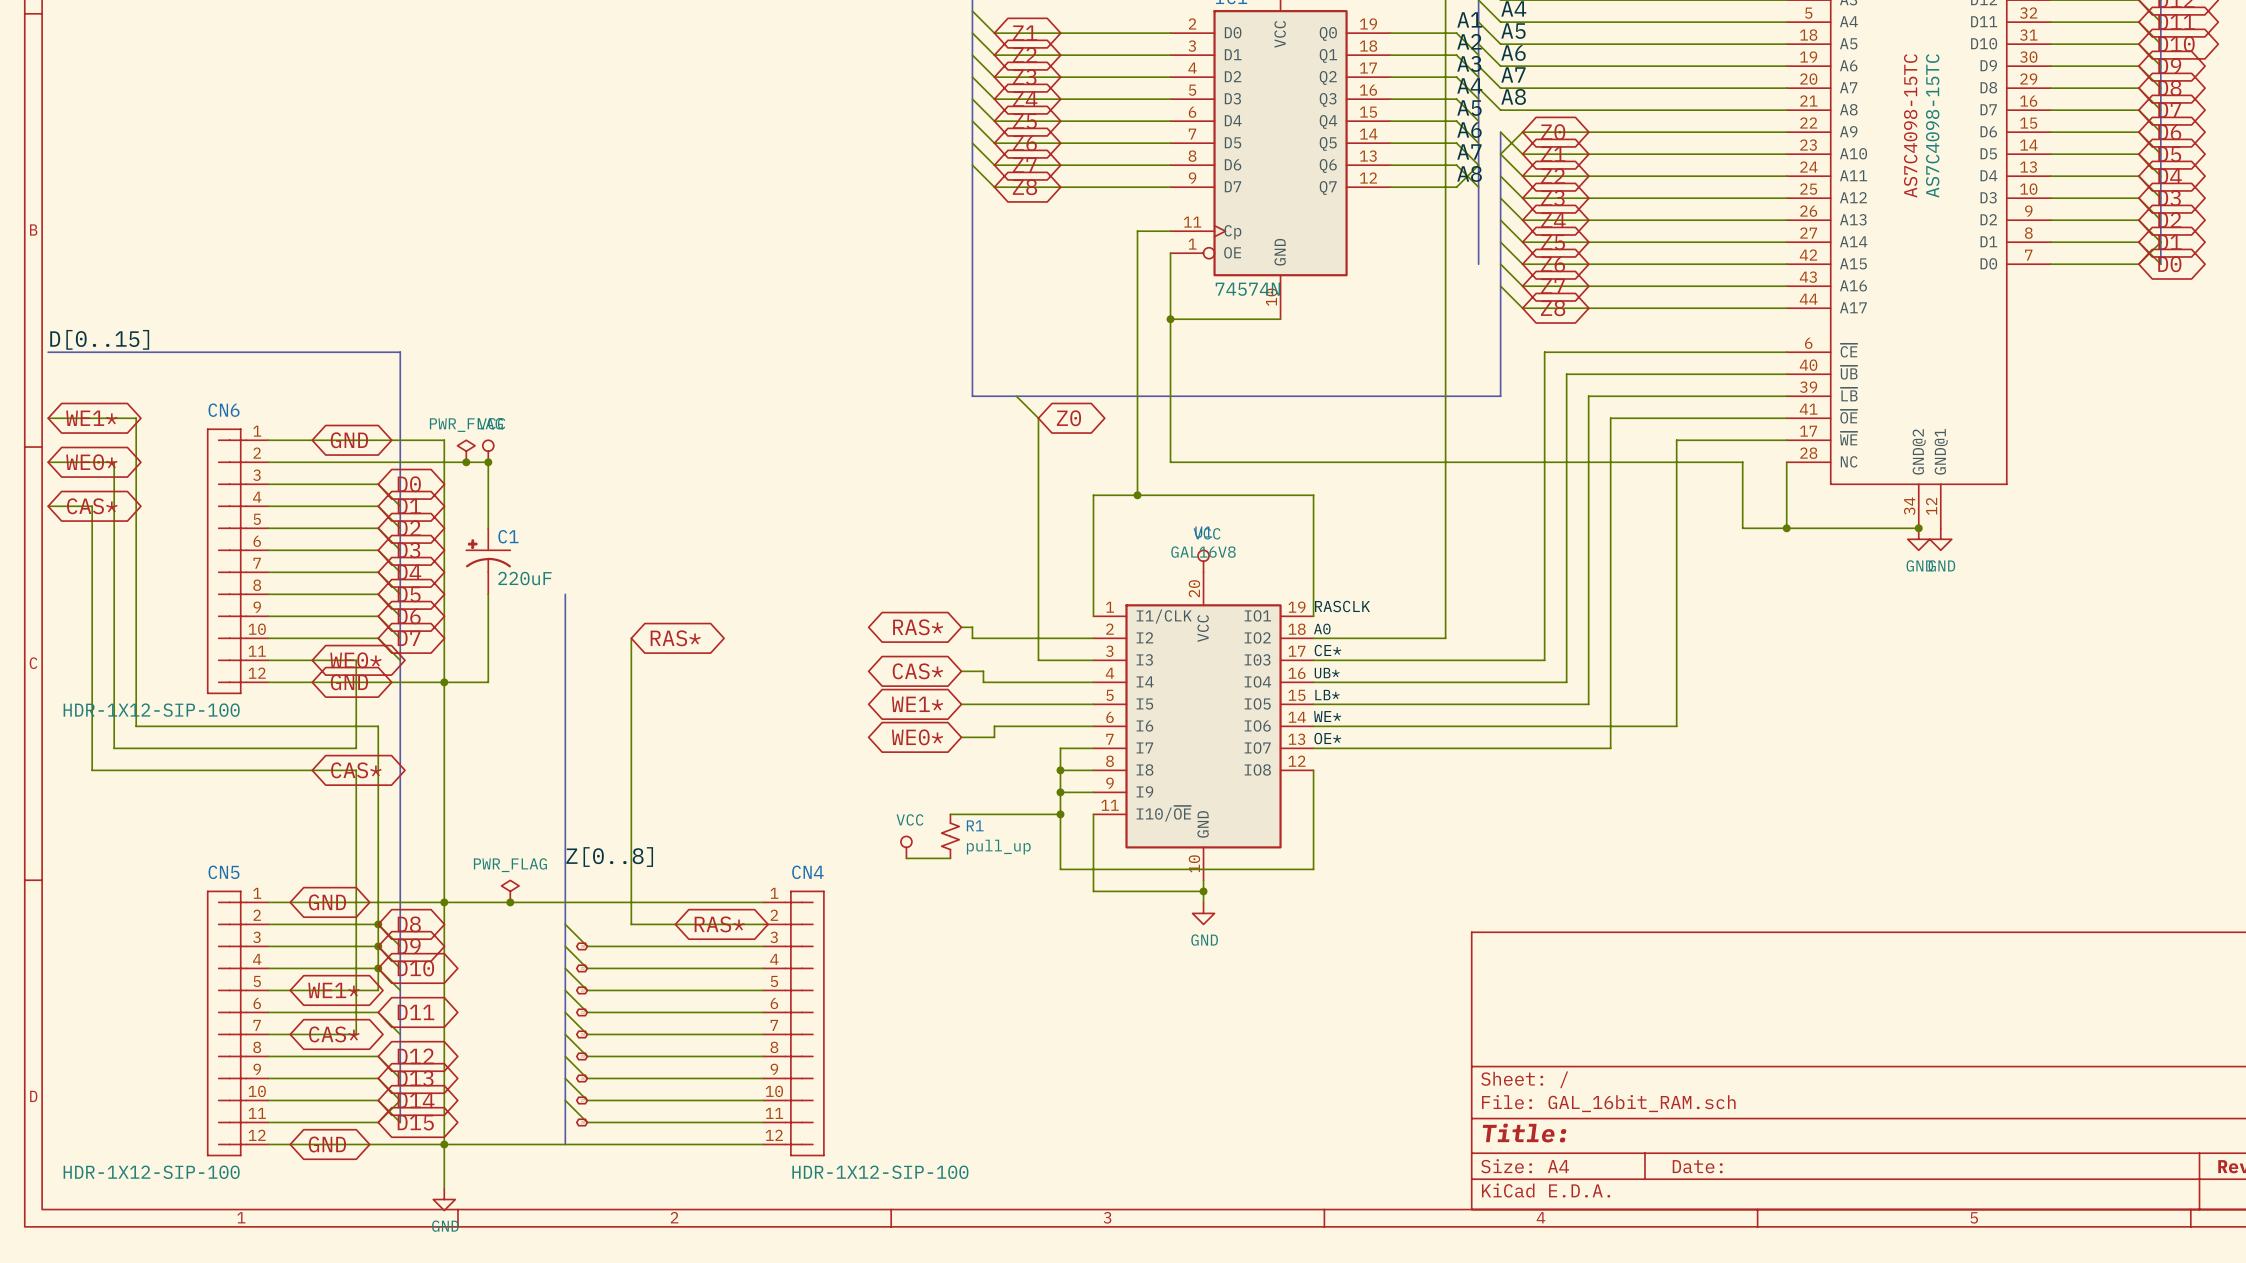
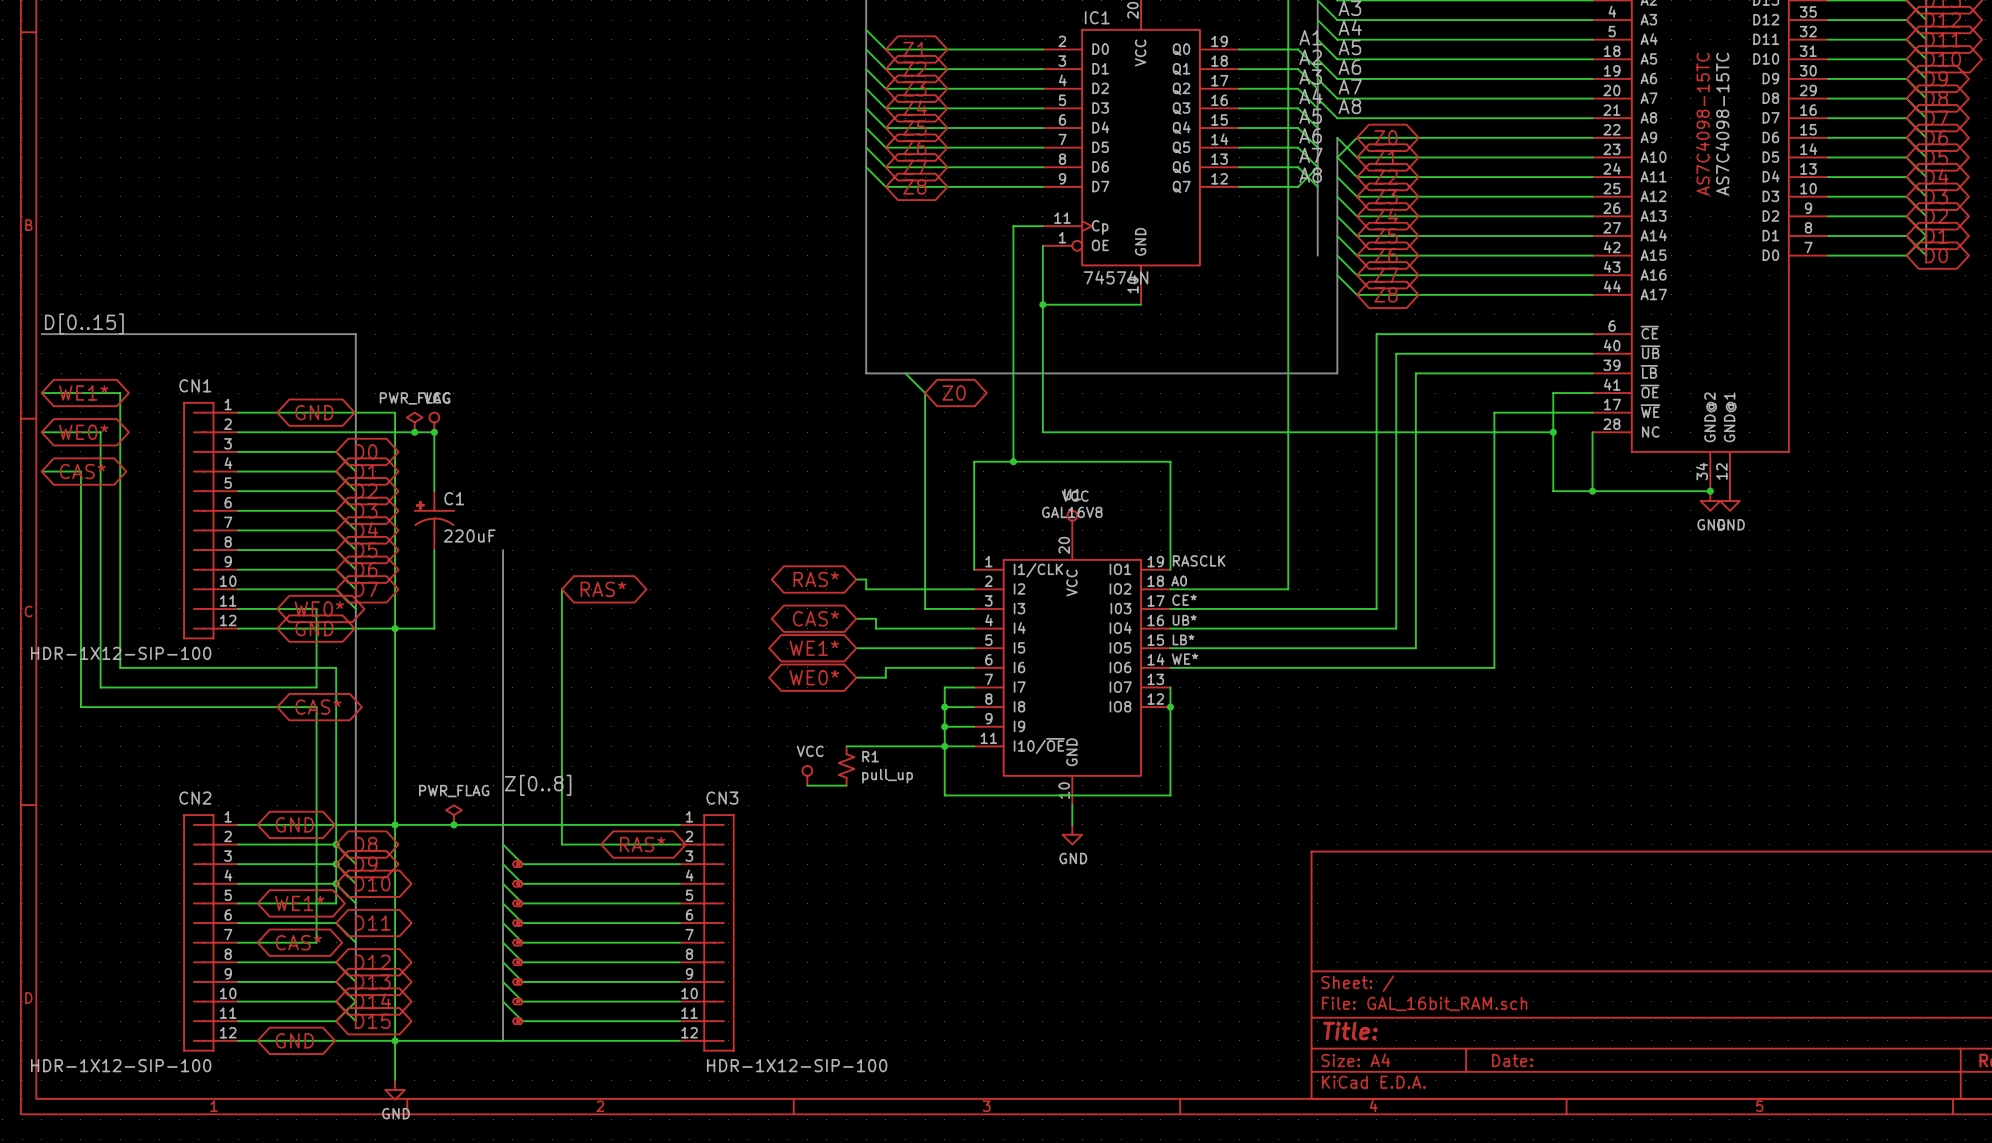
CN6 name: CN6 (224, 410) -> CN1 (195, 385)
wire: (1742, 418) (1610, 418) (1610, 748) (1313, 748) -> (1553, 393) (1553, 432)
junction: none -> (1553, 432)
label: OE* (1327, 738) -> none
wire: none -> (1170, 687) (1170, 707)
junction: none -> (1170, 707)
wire: (1093, 814) (1093, 891) (1203, 891) -> (974, 746) (944, 746)
CN5 name: CN5 (224, 872) -> CN2 (195, 798)
CN4 name: CN4 (807, 872) -> CN3 (722, 798)
junction: (1203, 891) -> none

